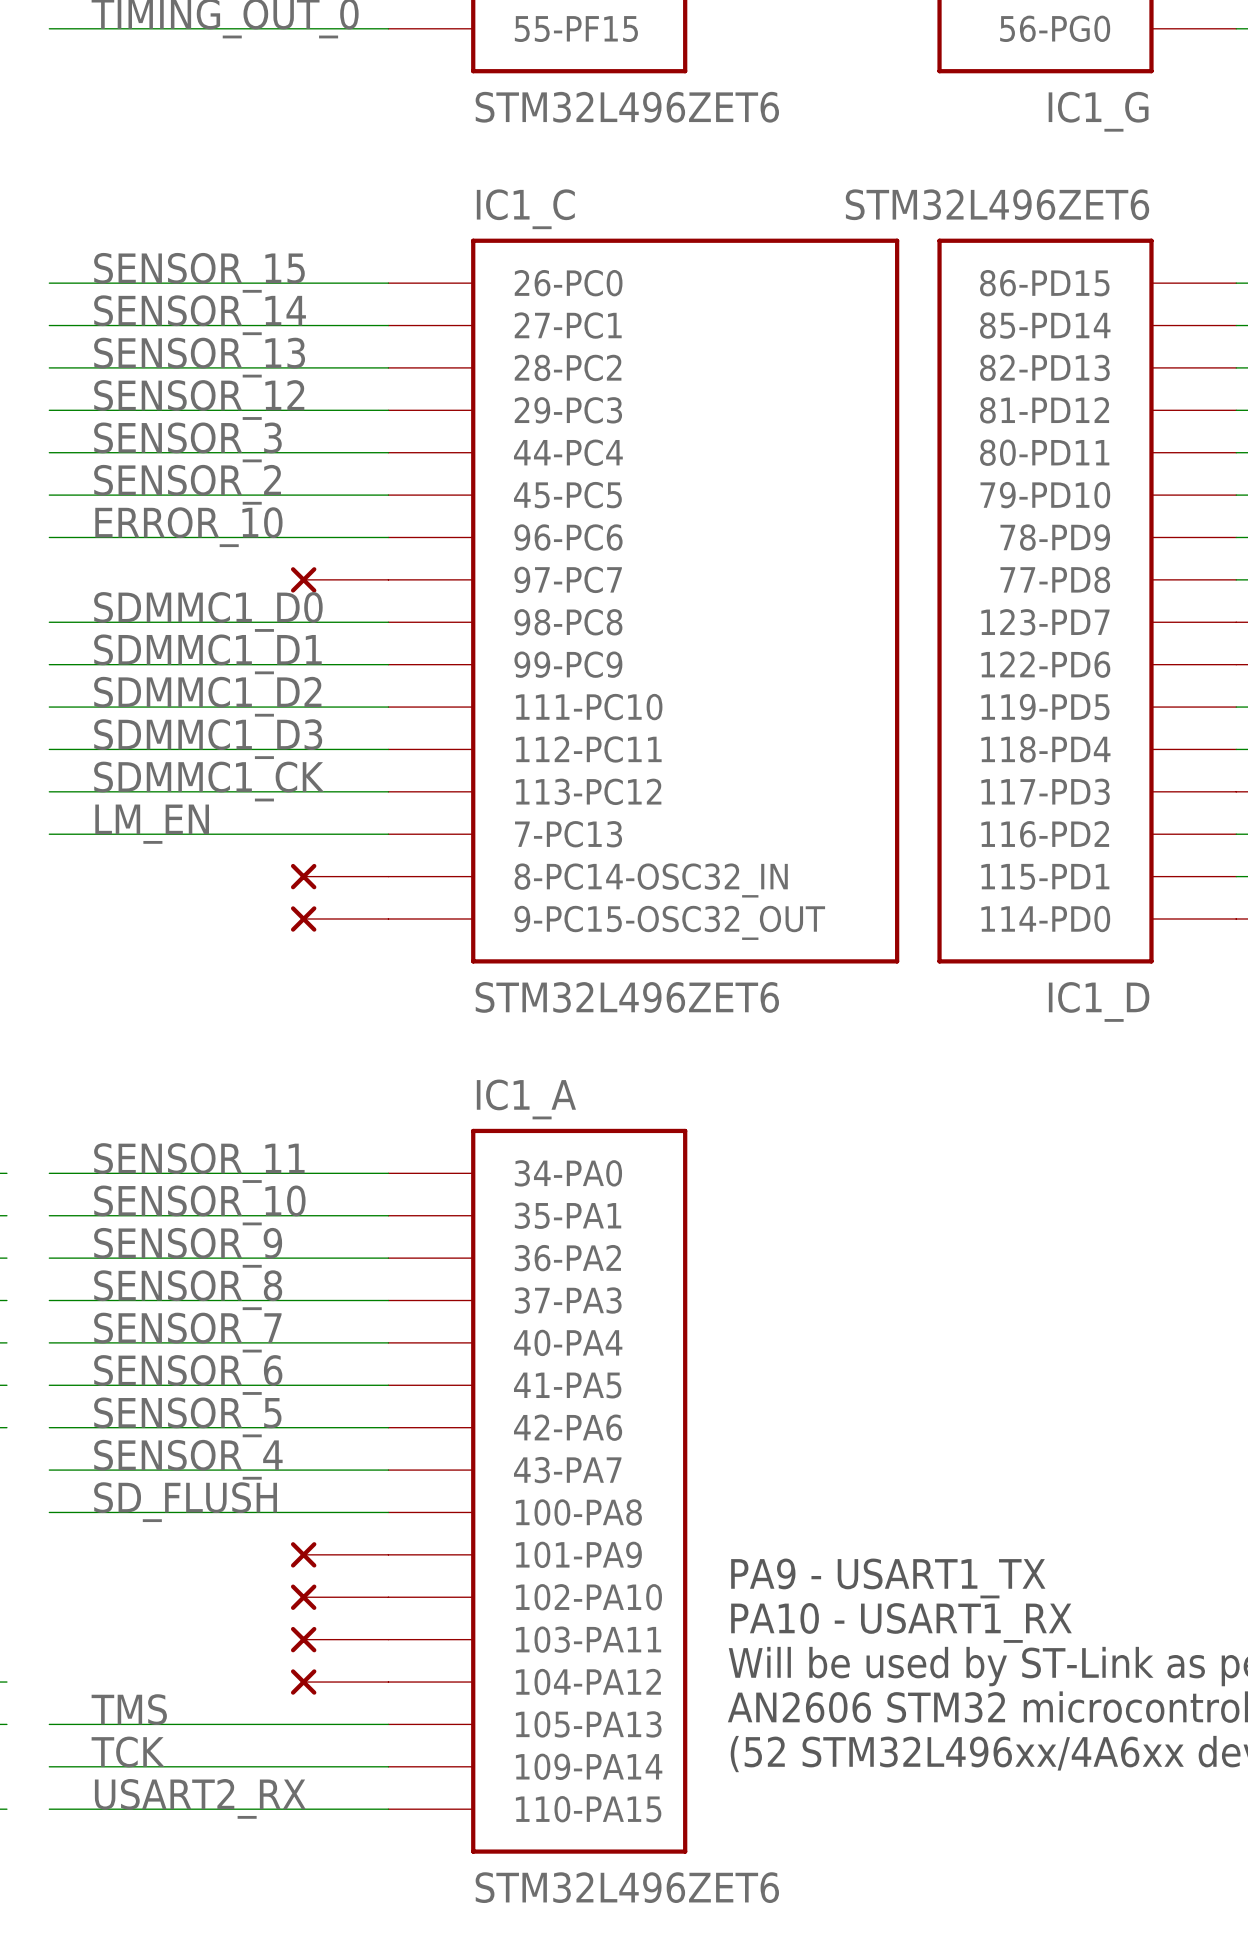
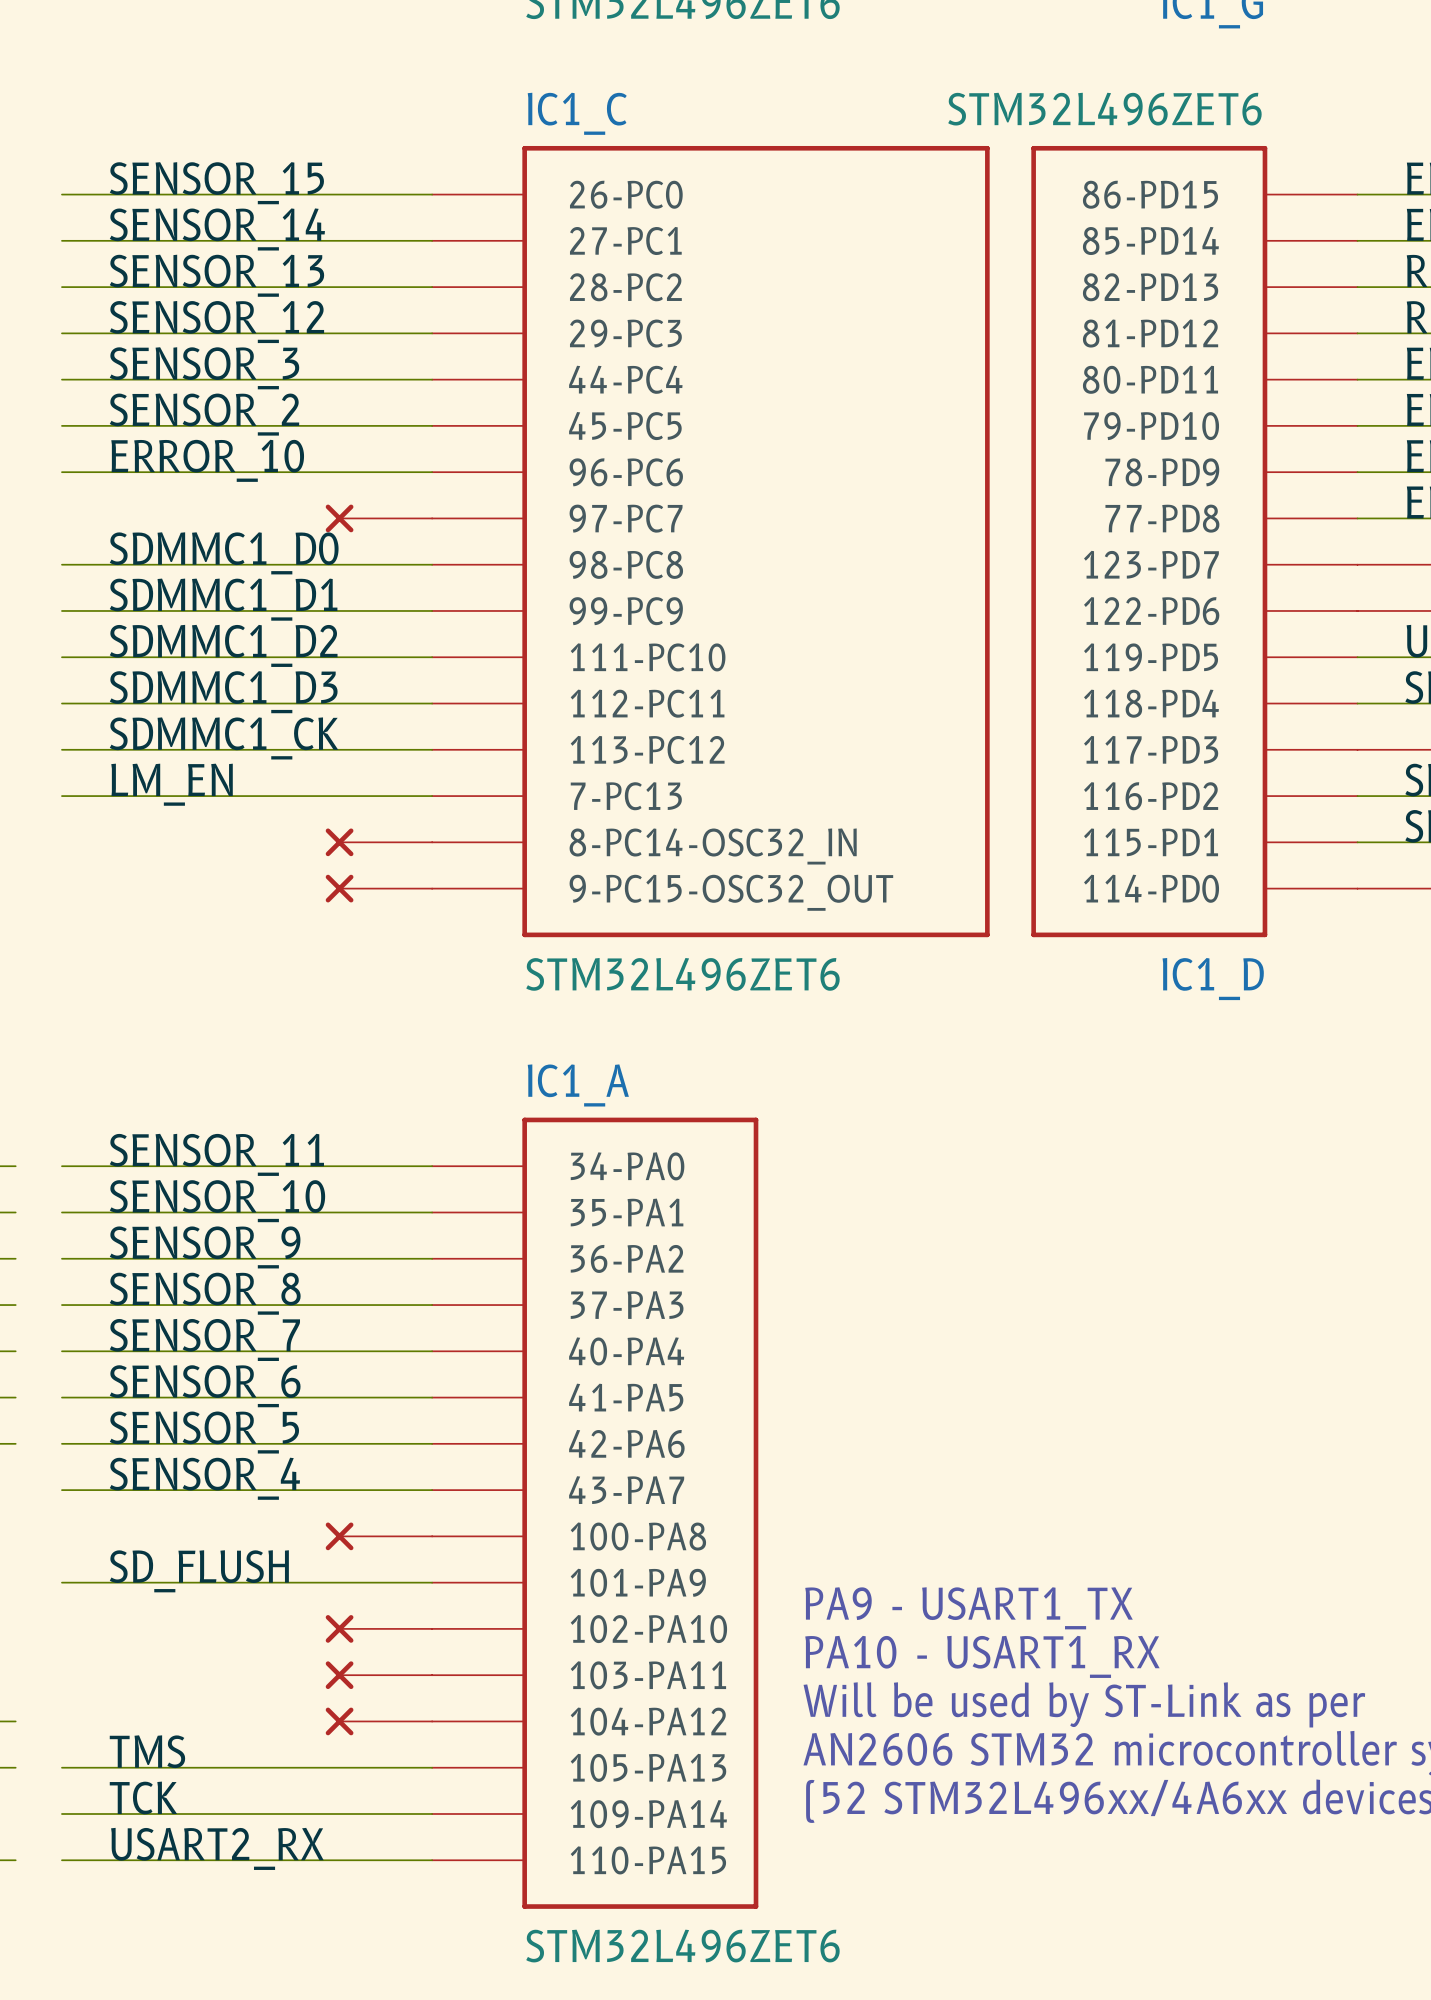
label position: SD_FLUSH (185, 1502) -> SD_FLUSH (199, 1571)
wire: (49, 1512) (388, 1512) -> (61, 1582) (432, 1582)
part position: (339, 1554) -> (378, 1536)

